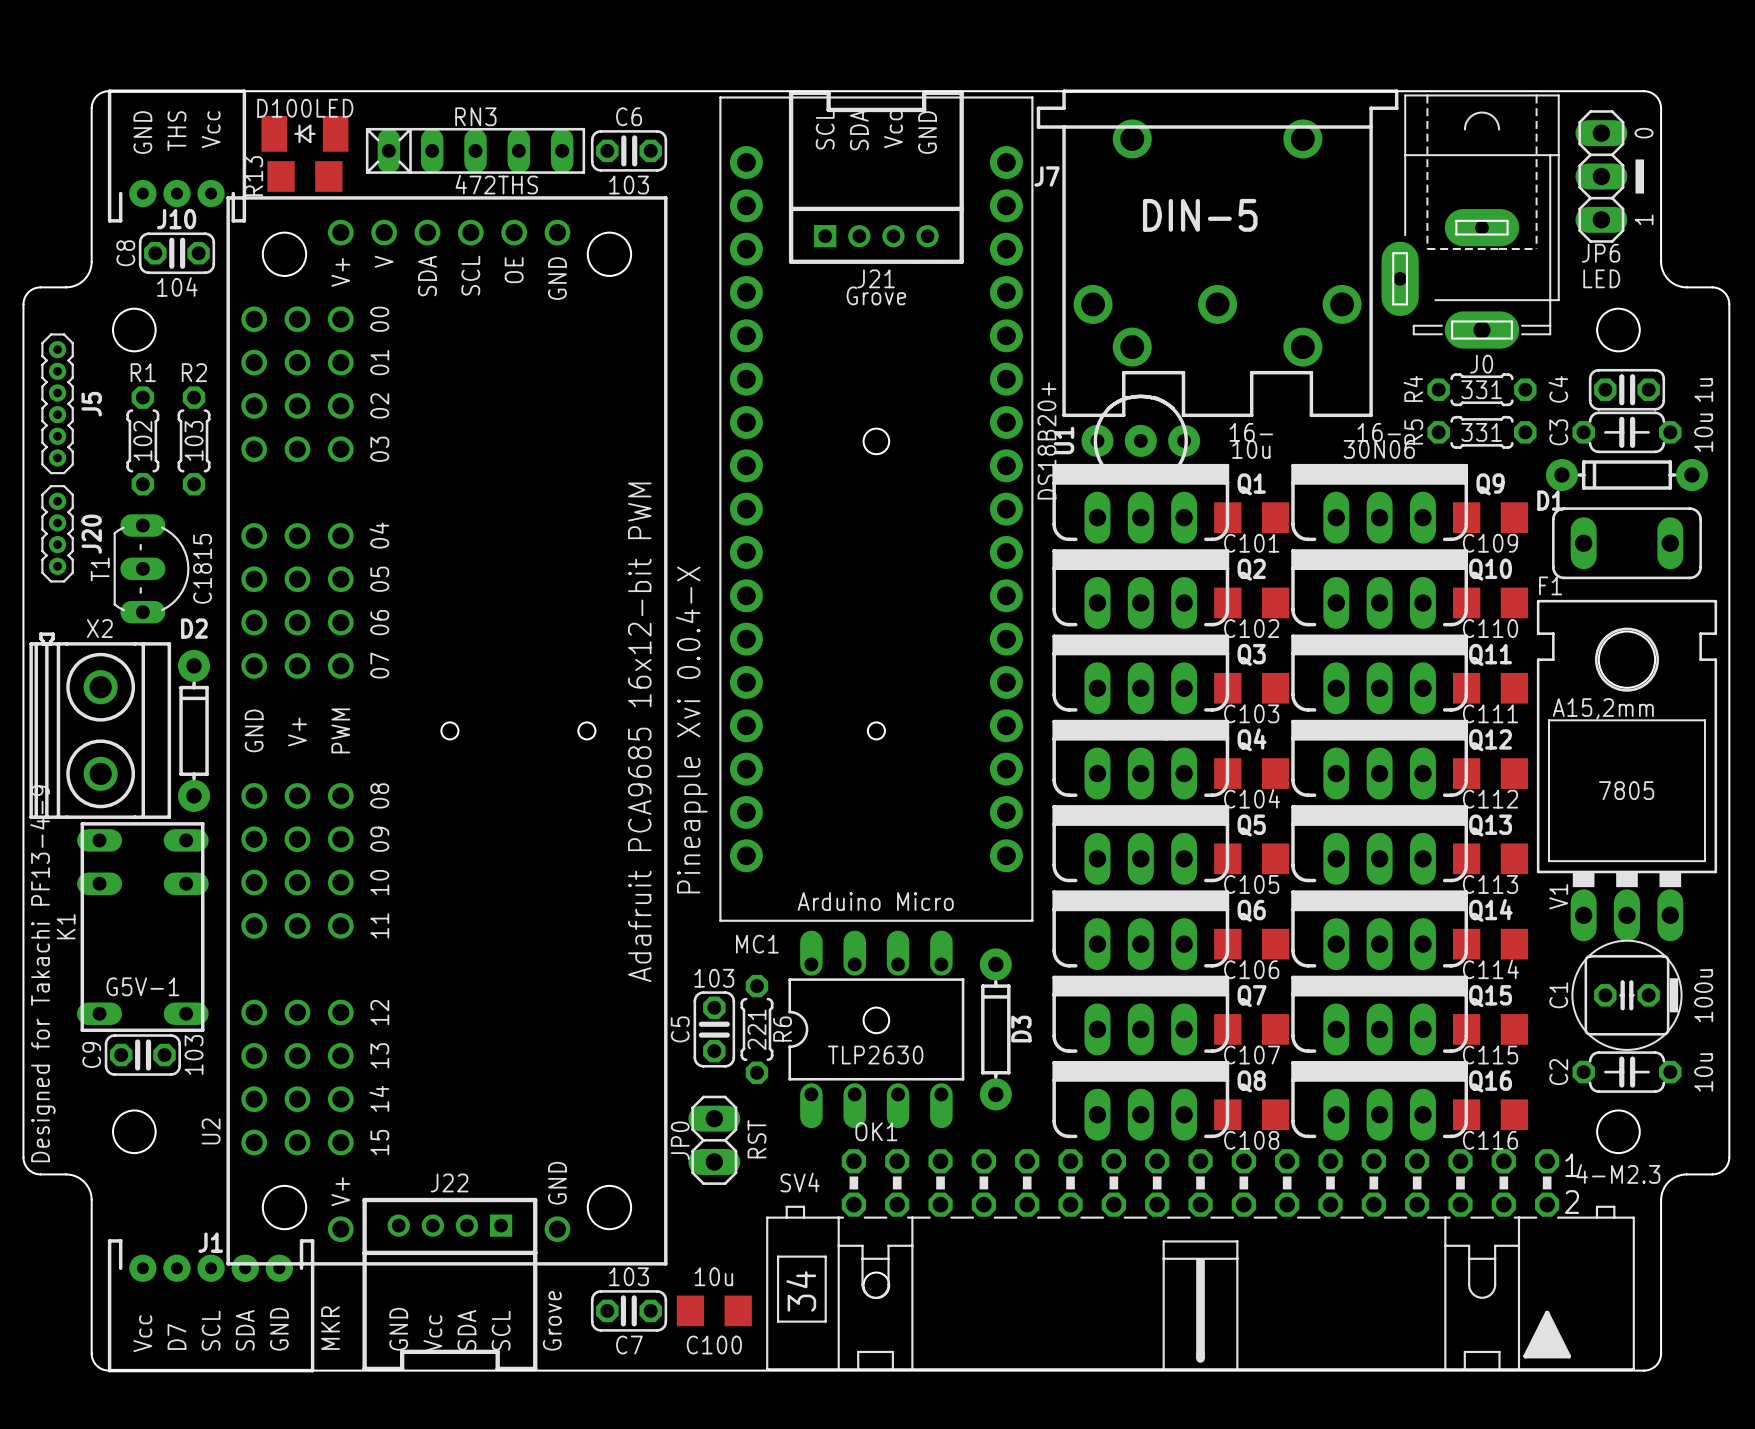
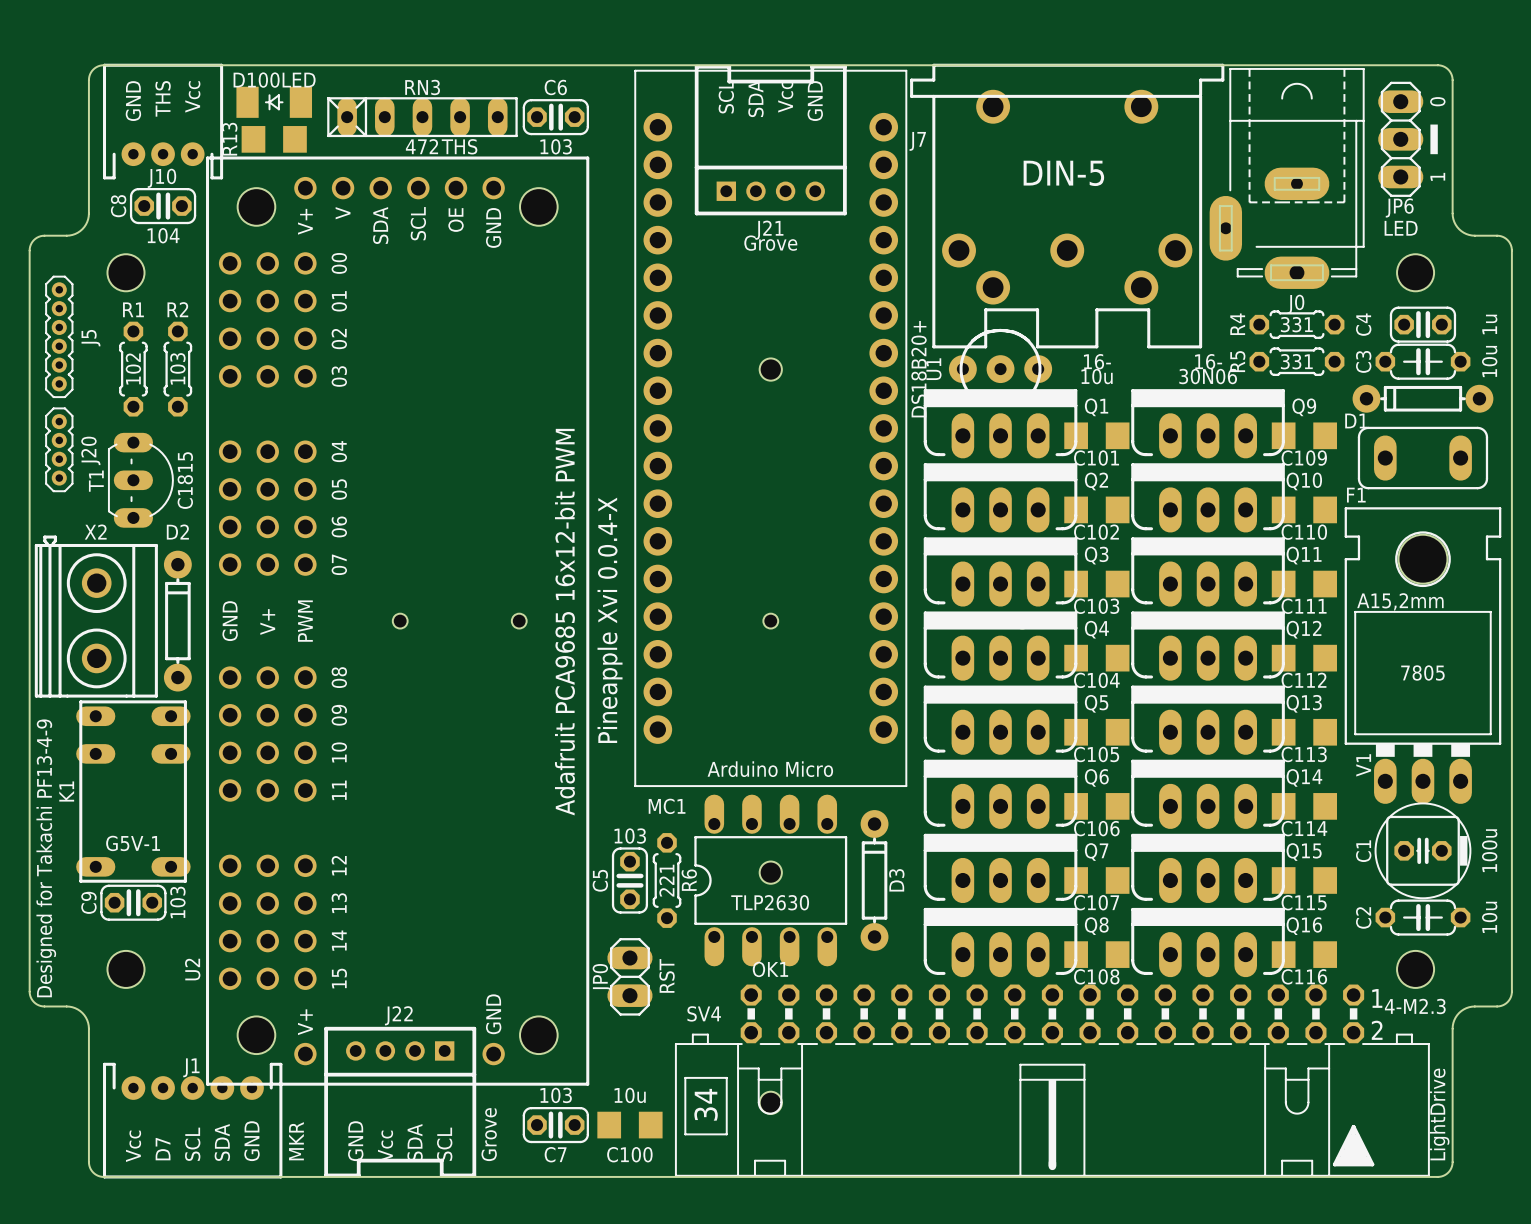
text: none -> LightDrive (1439, 1114)

